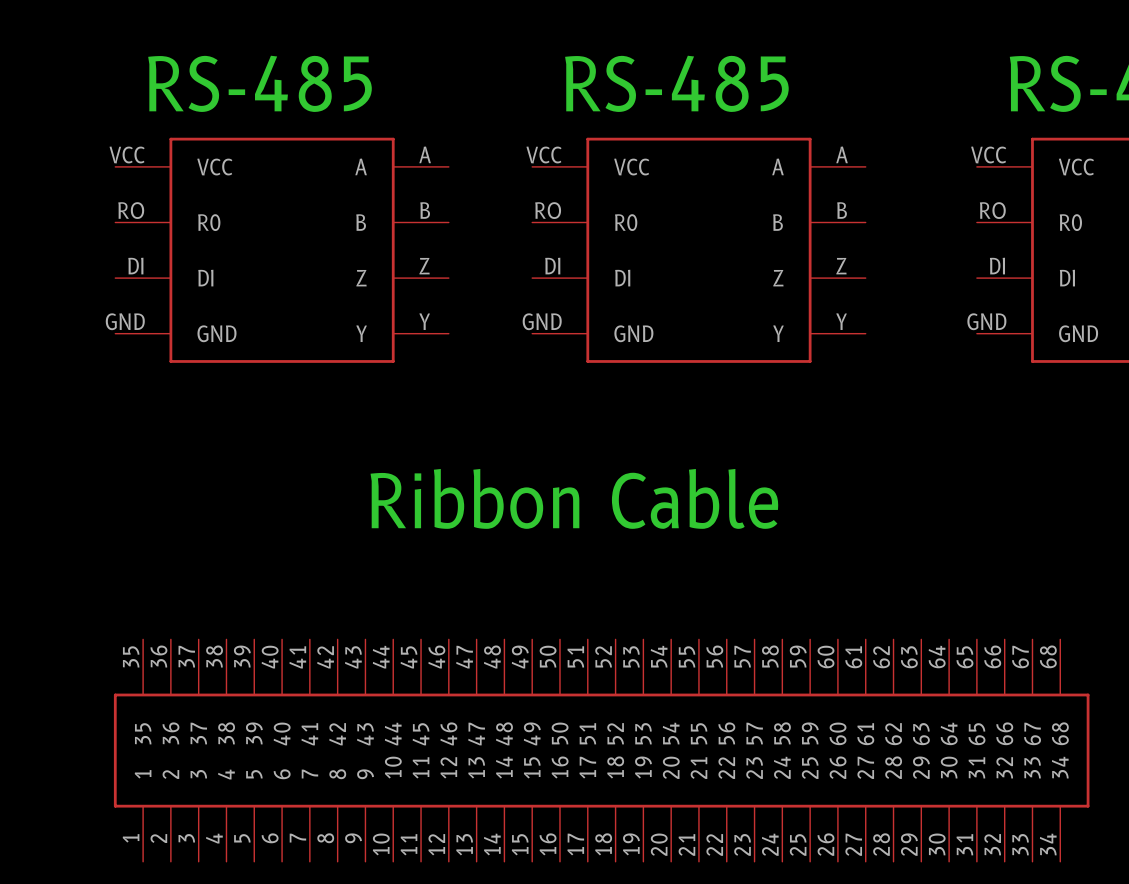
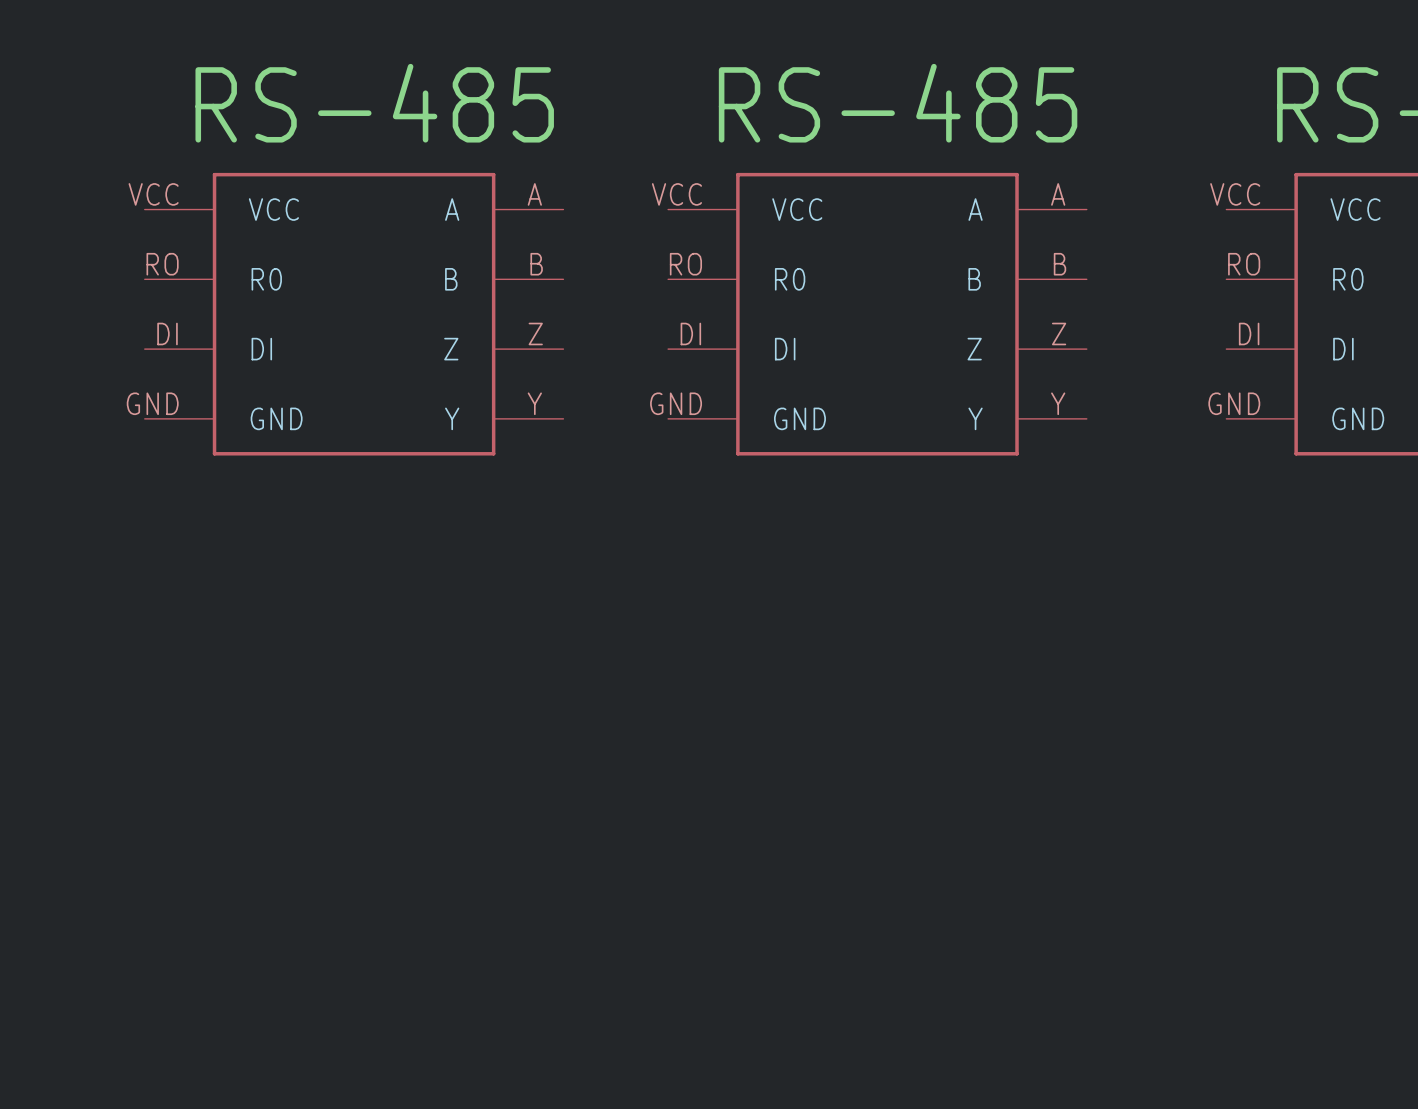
text: Ribbon Cable (574, 498) -> none
part: (601, 750) -> none

